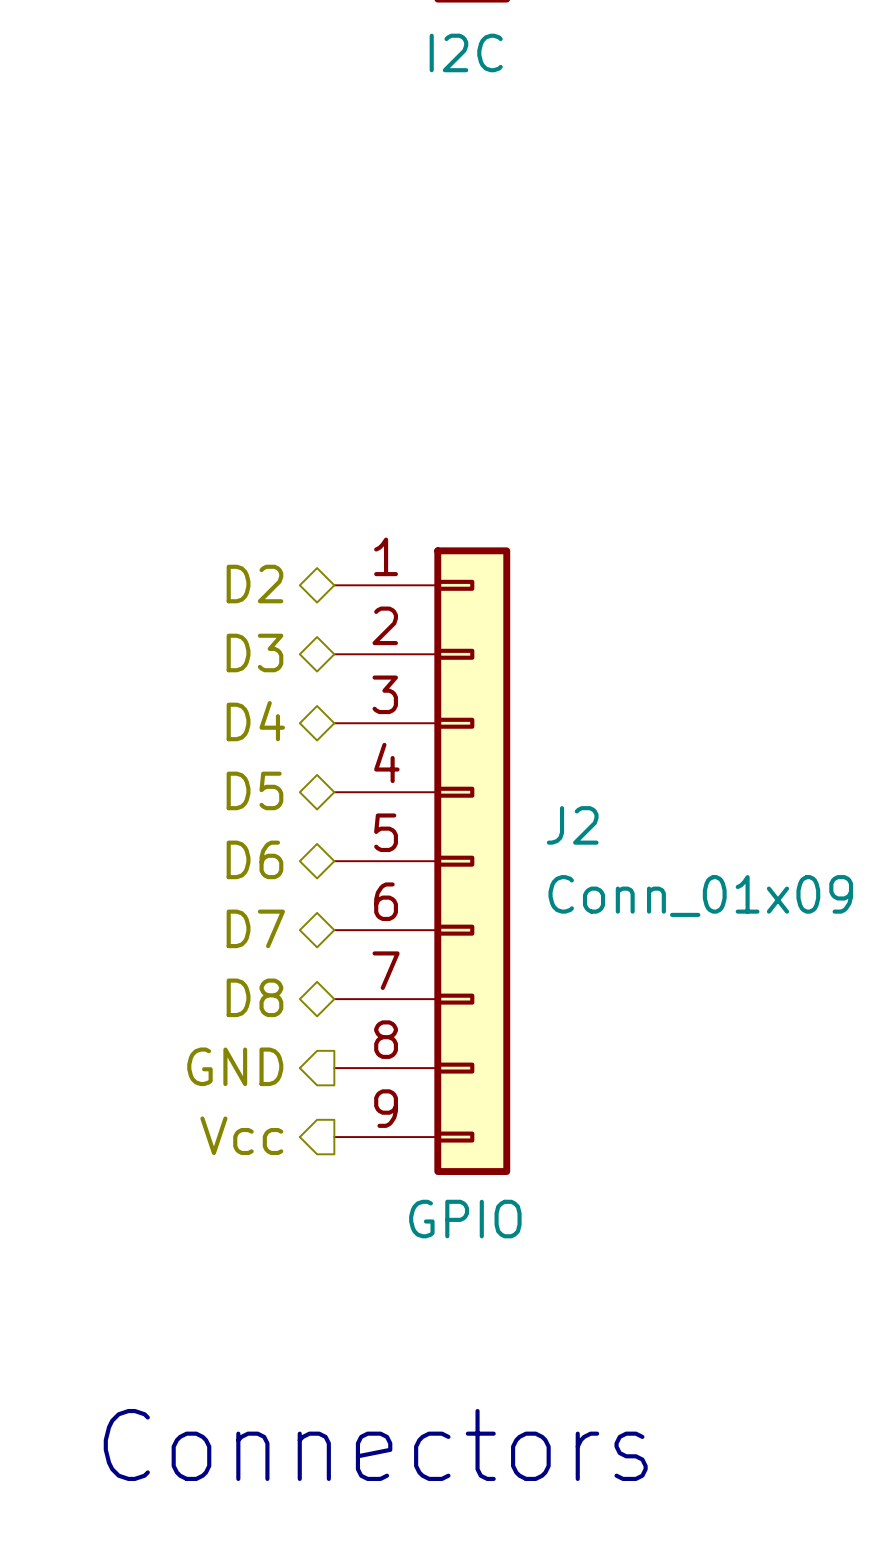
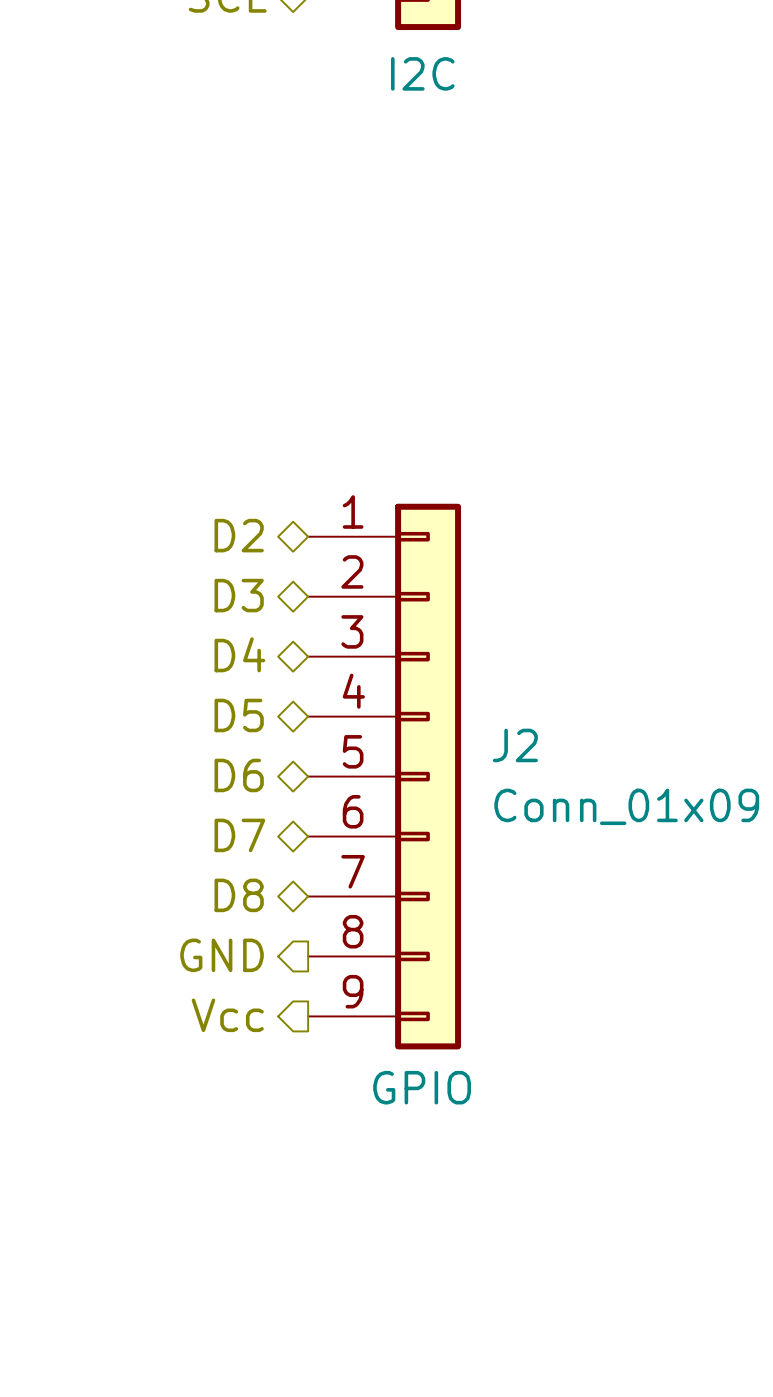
text: Connectors (375, 1444) -> none

